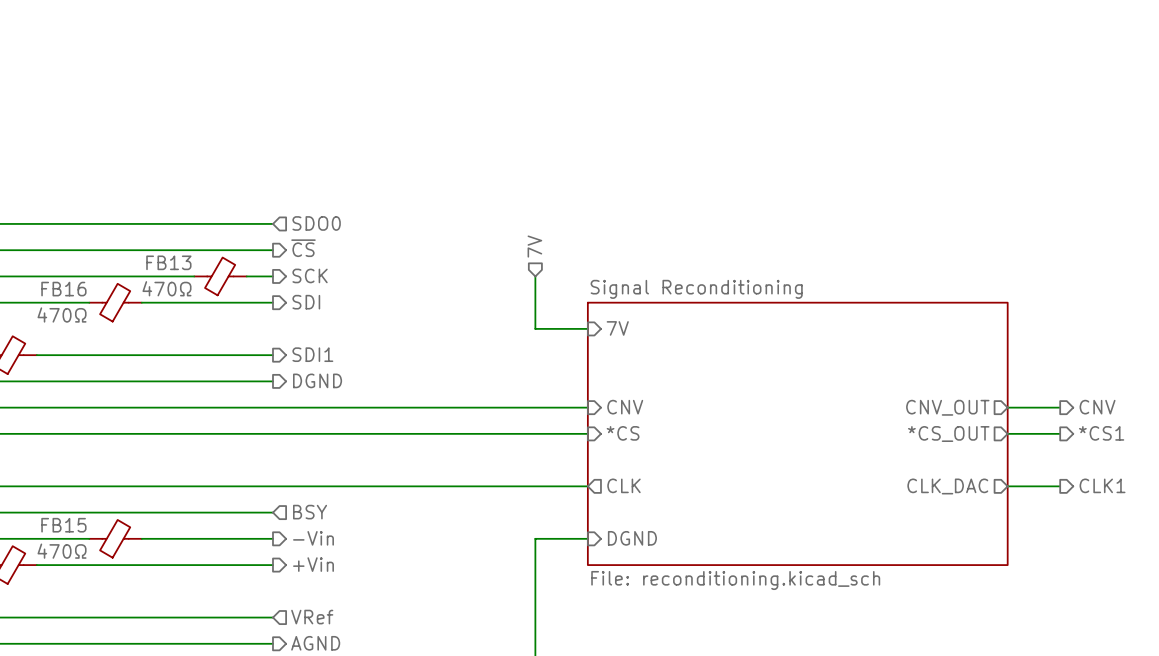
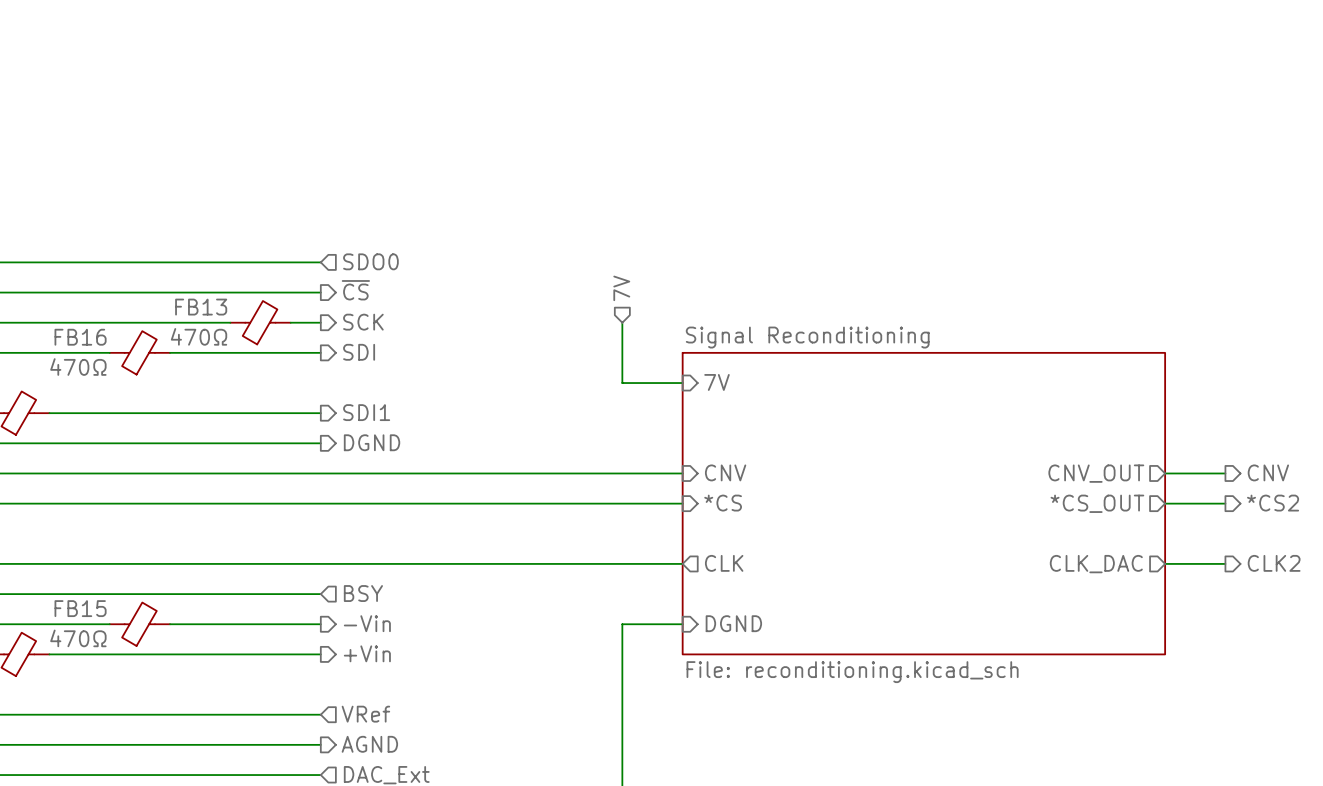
hierarchical label: *CS1 (1101, 433) -> *CS2 (1273, 503)
hierarchical label: CLK1 (1102, 485) -> CLK2 (1274, 563)

